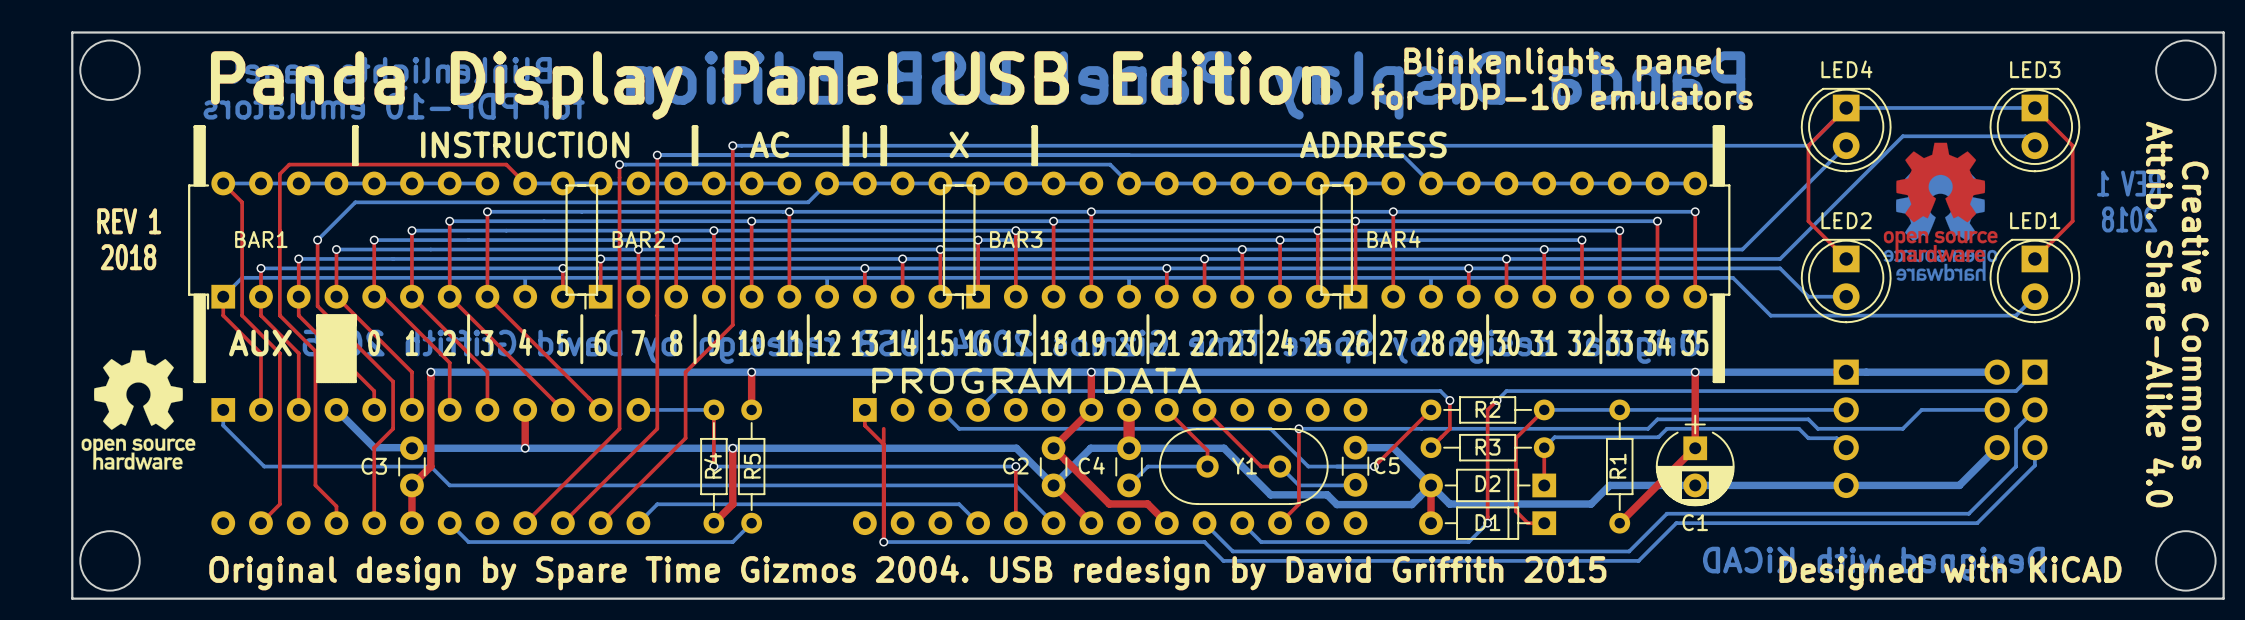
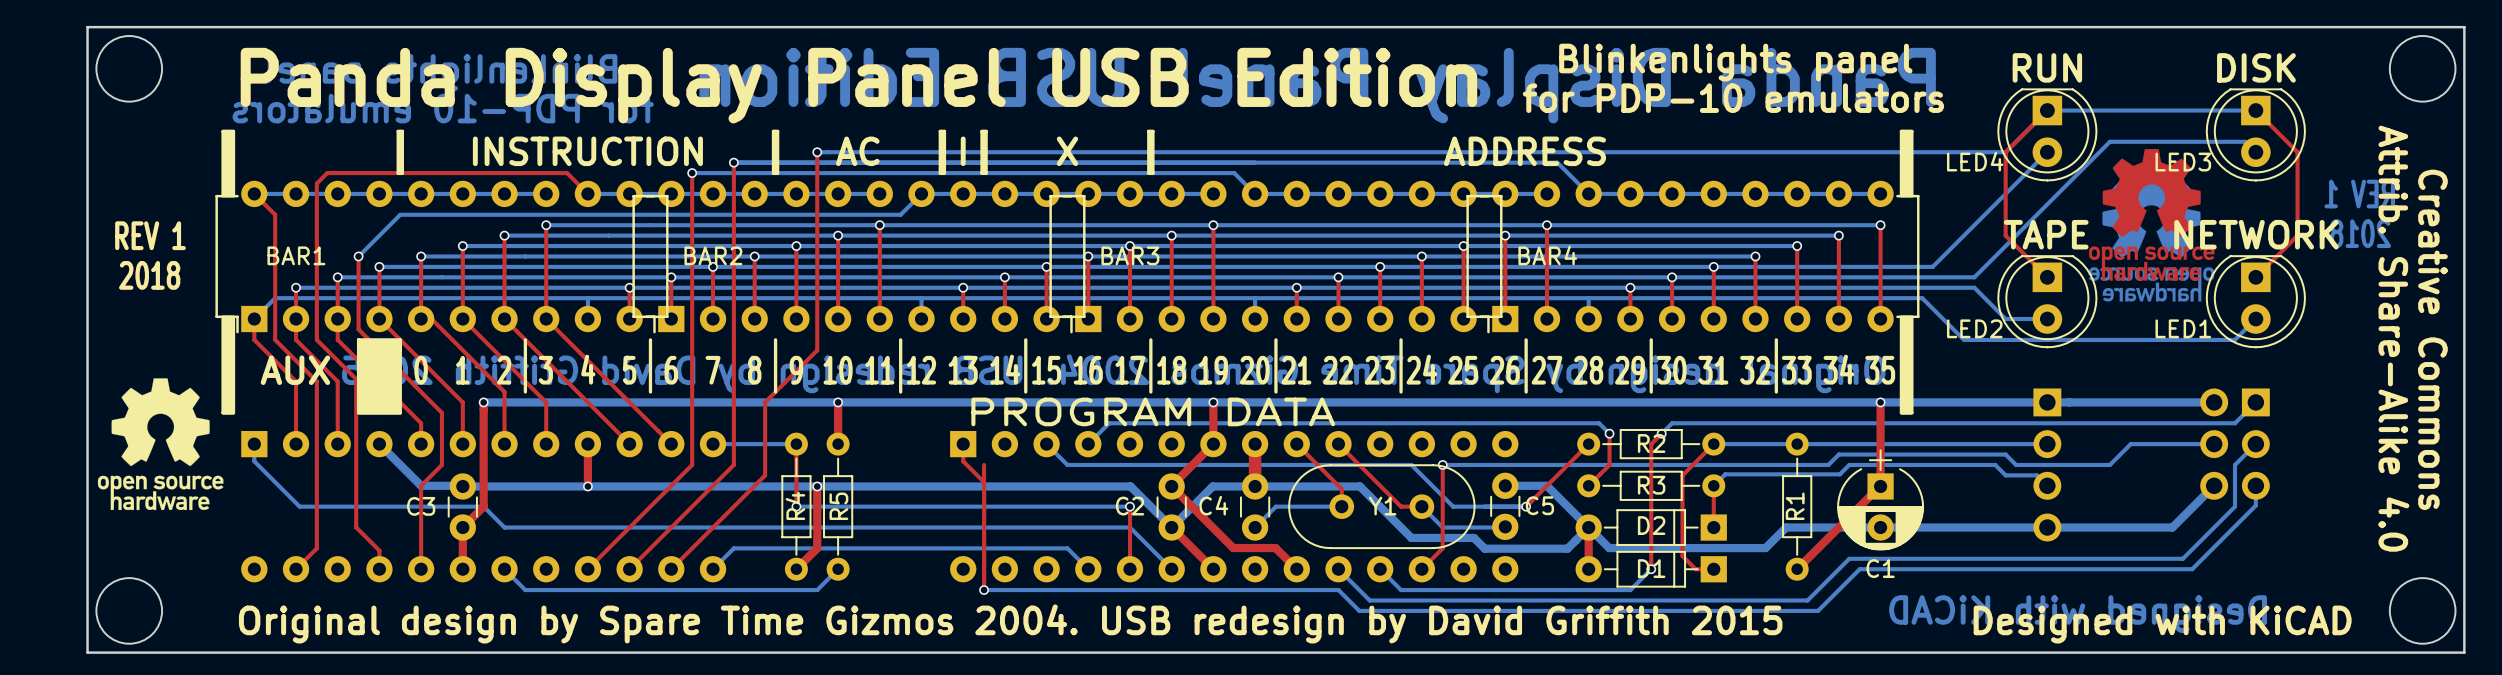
LED4 name position: LED4 (1846, 69) -> LED4 (1975, 161)
text: none -> RUN (2047, 67)
LED3 name position: LED3 (2035, 69) -> LED3 (2183, 162)
text: none -> DISK (2256, 67)
text: none -> TAPE (2046, 234)
LED2 name position: LED2 (1846, 220) -> LED2 (1974, 328)
LED1 name position: LED1 (2035, 220) -> LED1 (2183, 328)
text: none -> NETWORK (2256, 234)

